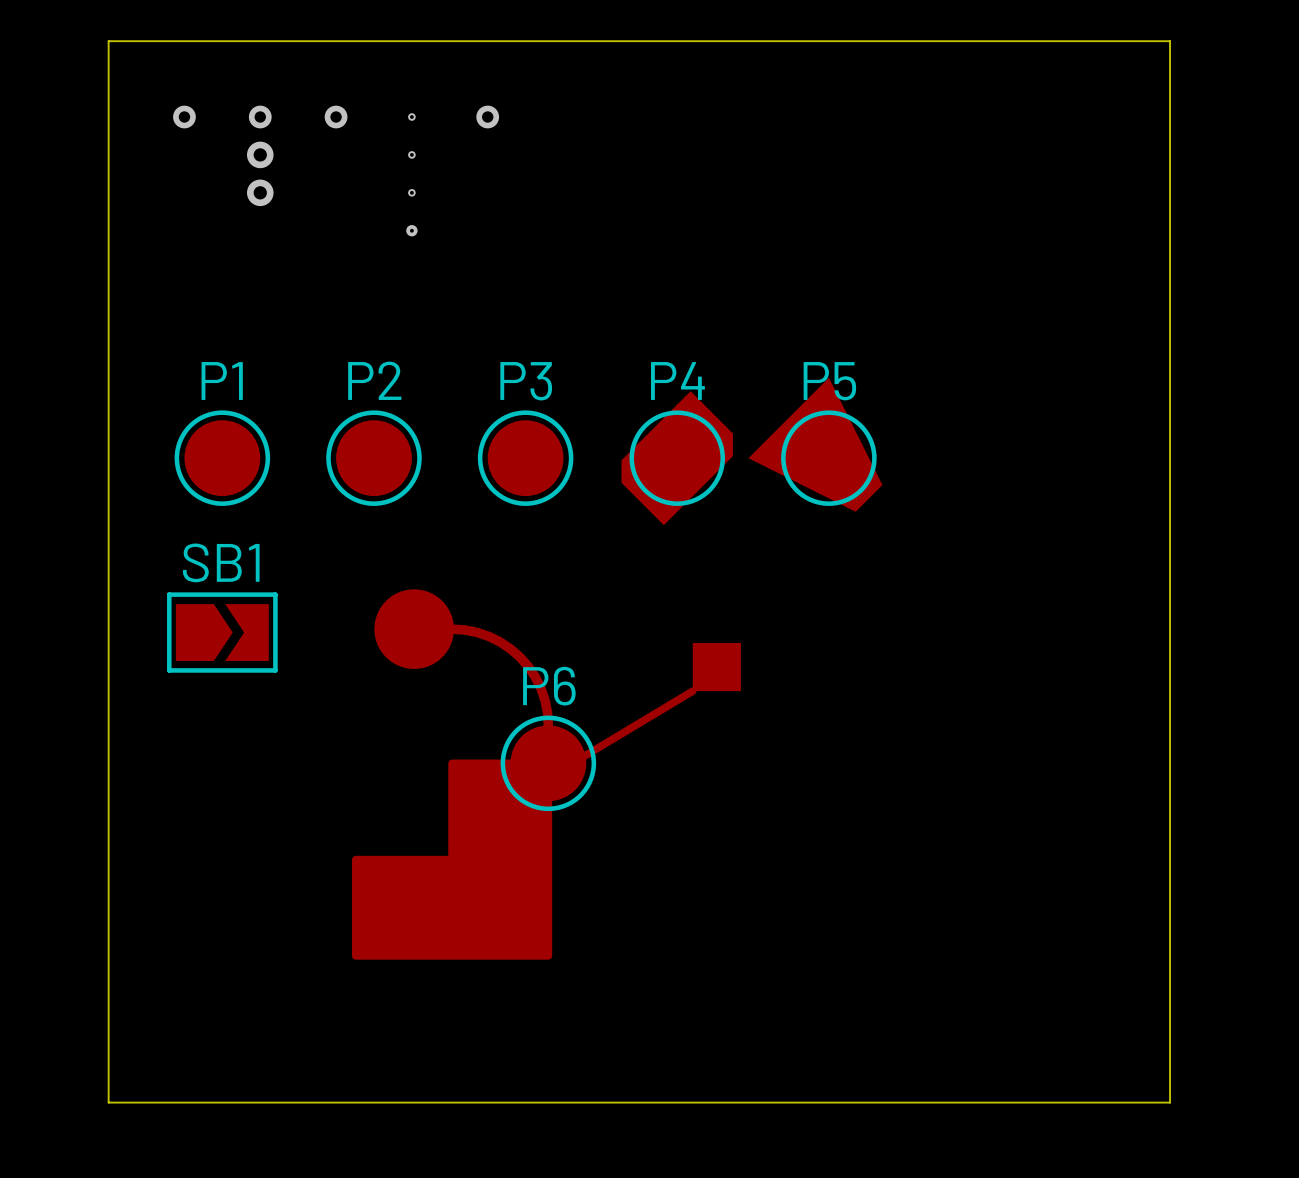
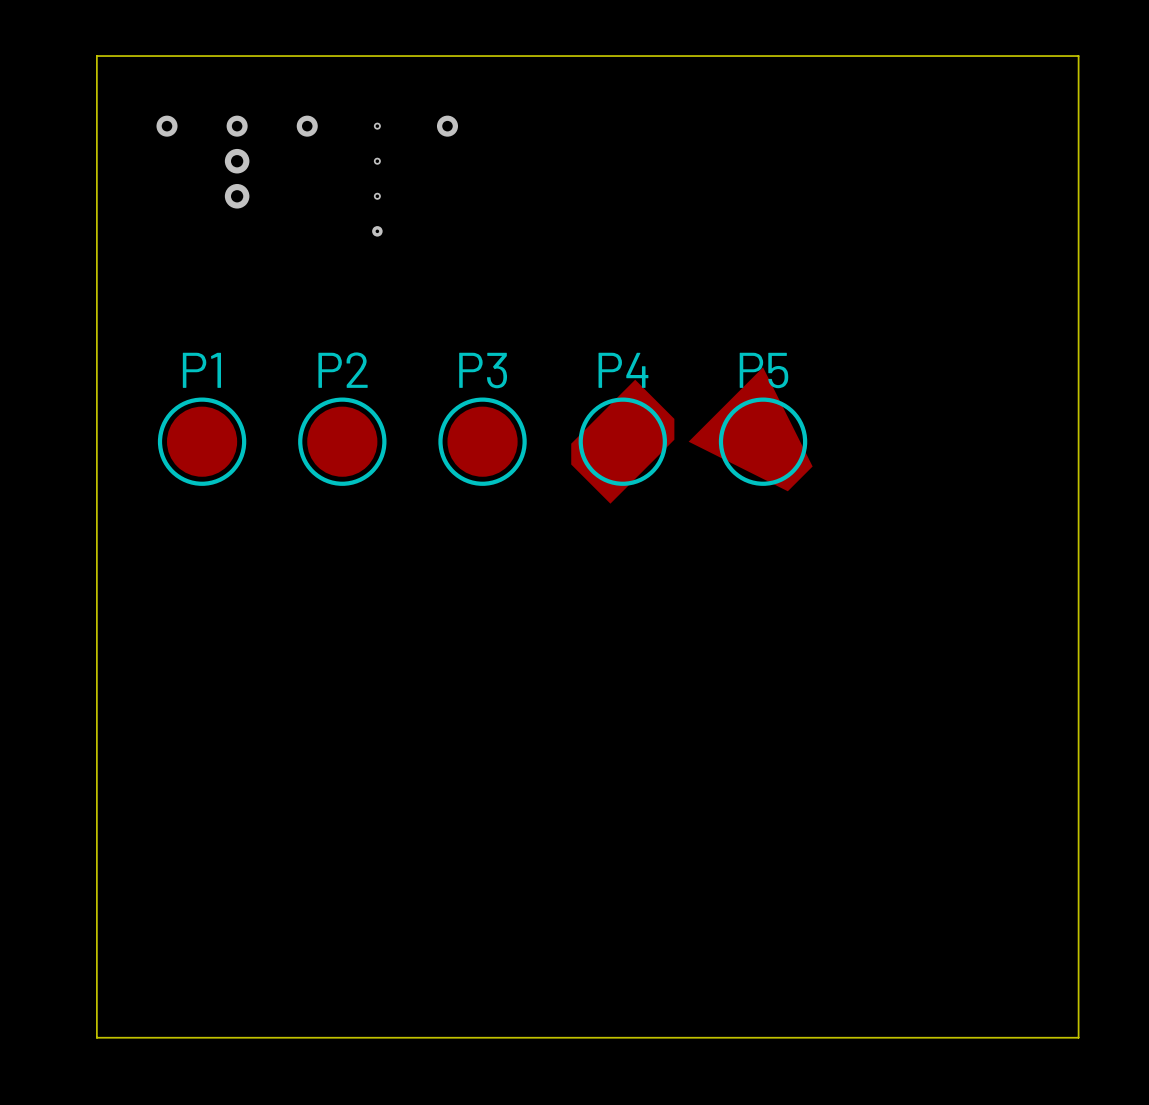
SB1: (222, 632) -> none
P6: (546, 774) -> none

